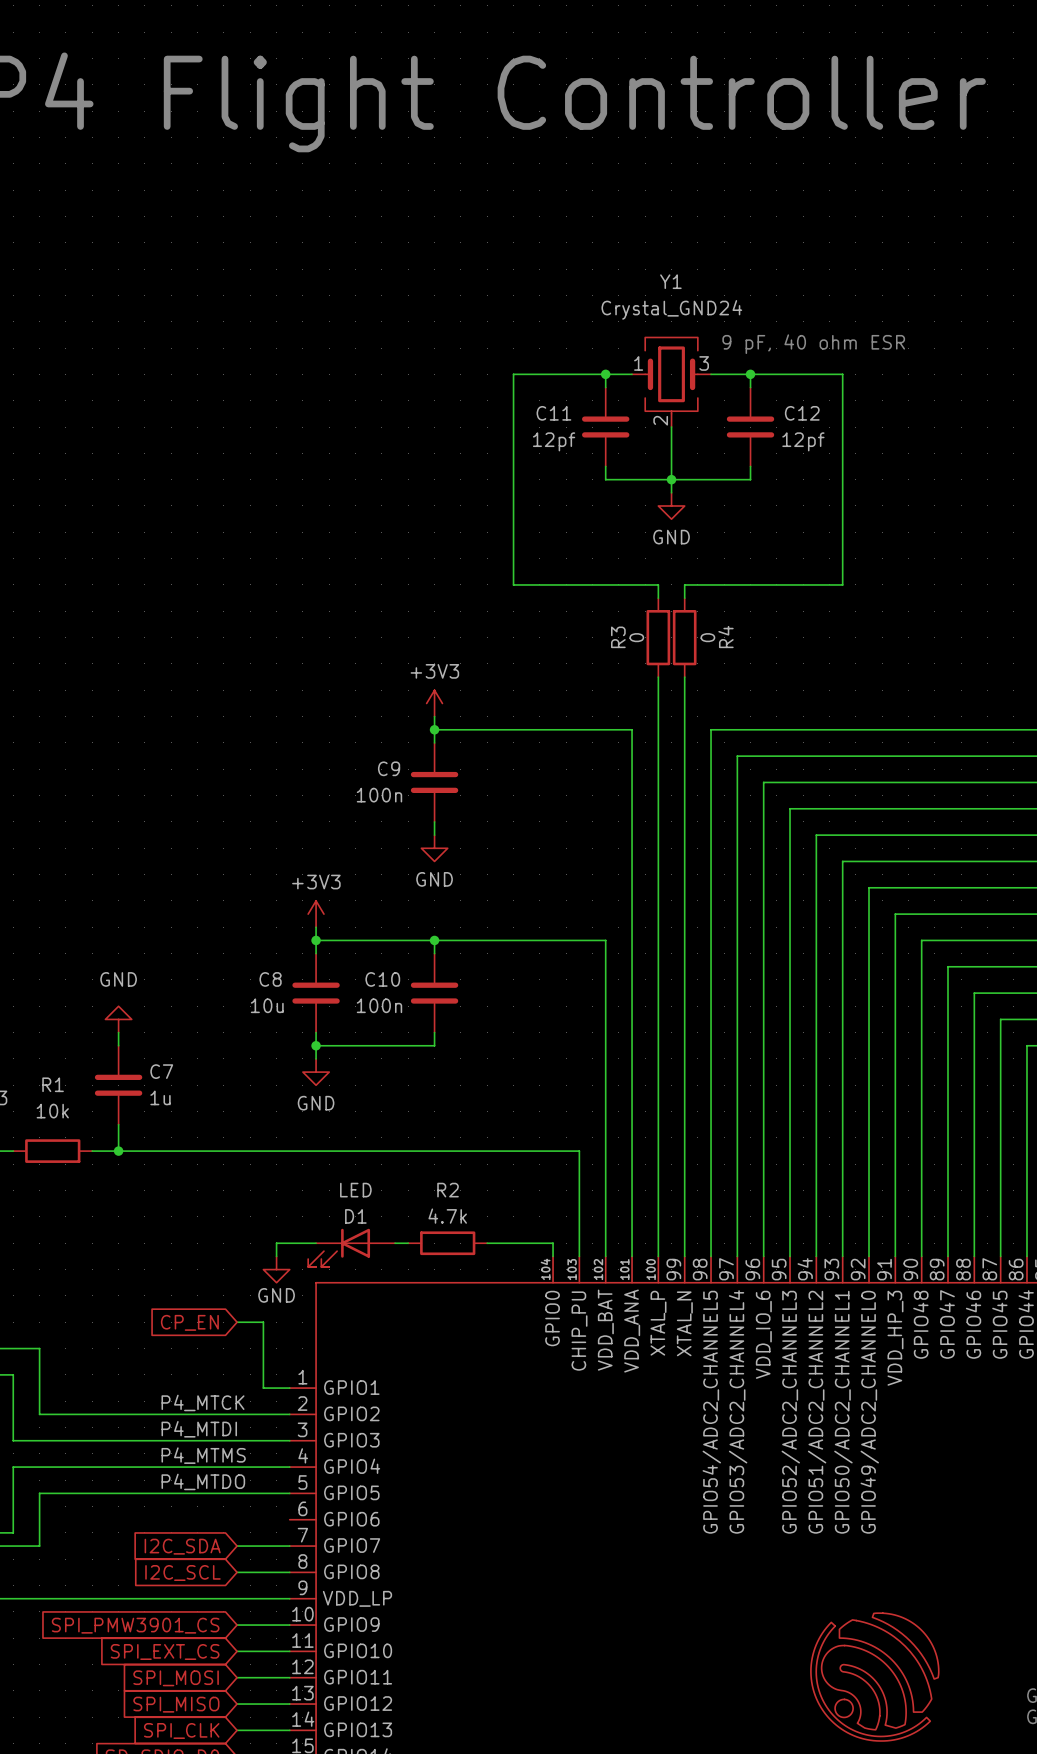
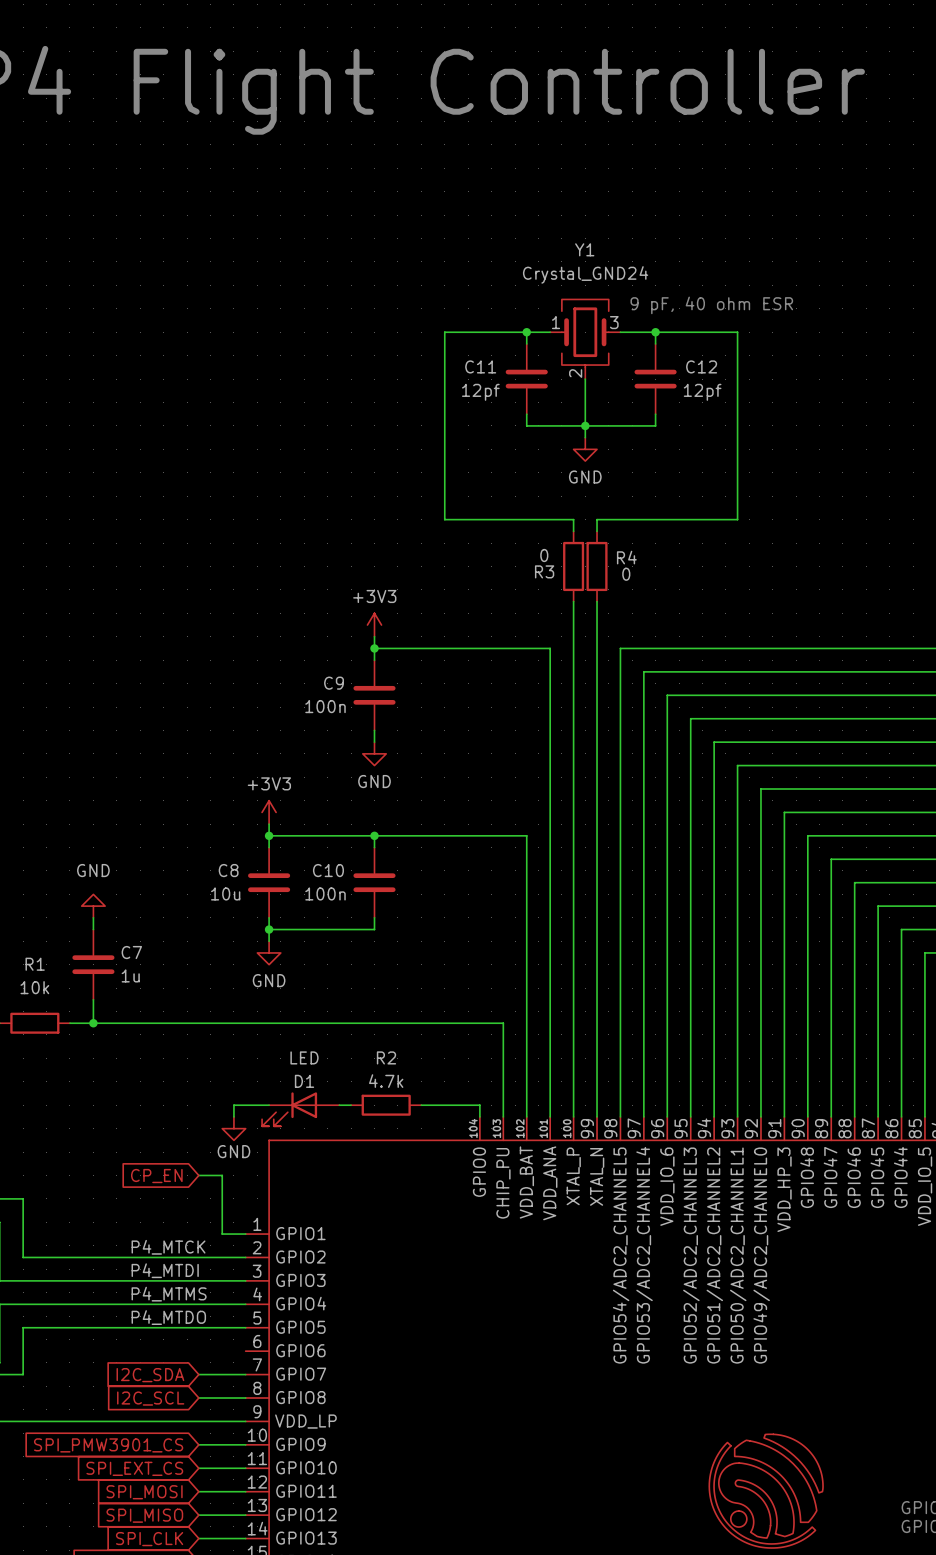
R3 name rotation: 0° (618, 637) -> 90° clockwise (544, 571)
R3 value rotation: 0° (636, 637) -> 90° clockwise (544, 555)
R4 value rotation: 0° (707, 637) -> 90° clockwise (626, 574)
R4 name rotation: 0° (726, 637) -> 90° clockwise (626, 557)

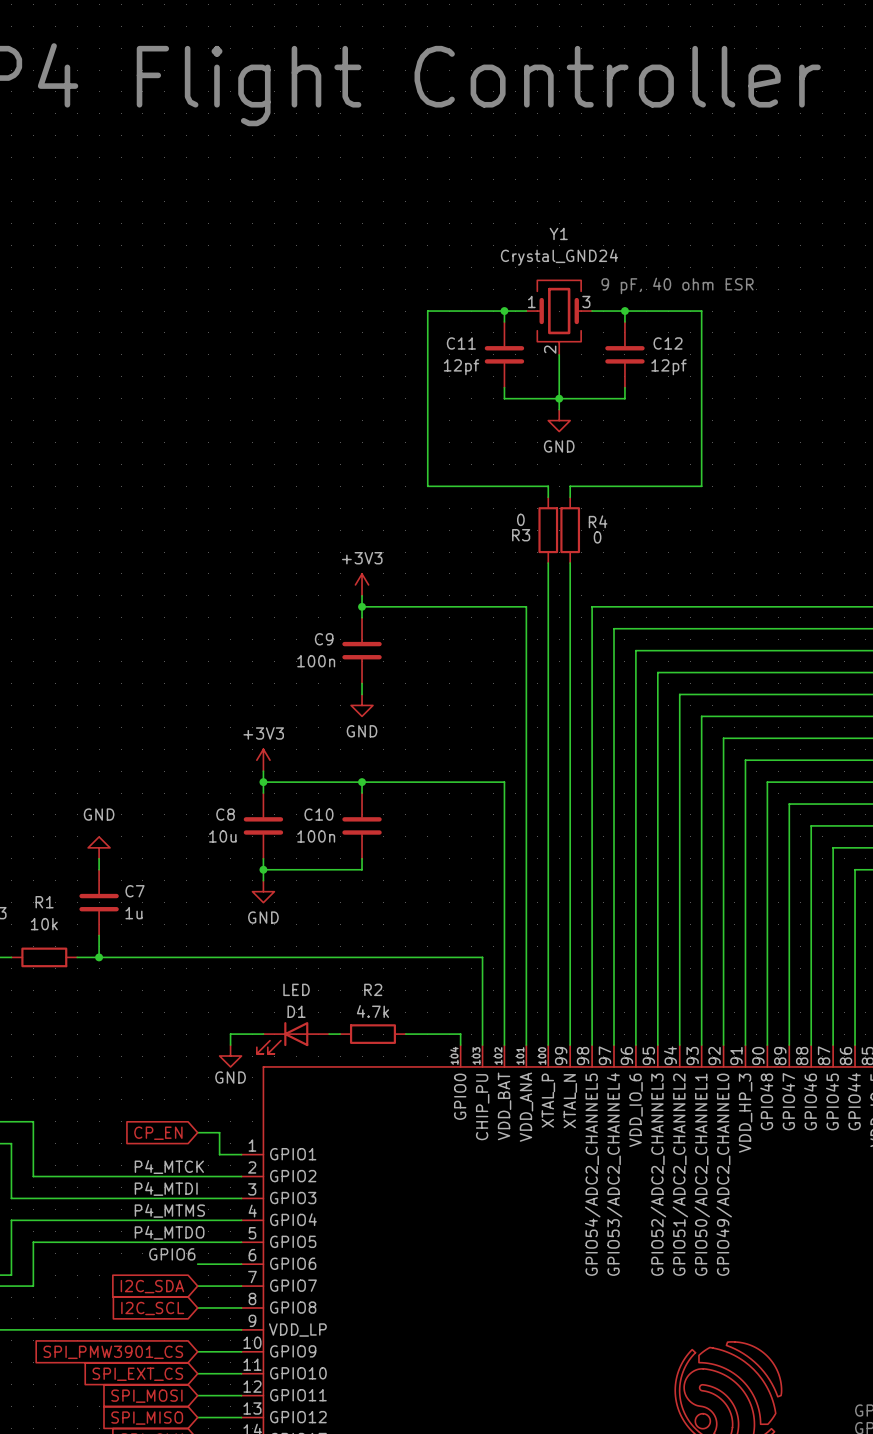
wire: (198, 1175) (222, 1175) (222, 1210) -> (197, 1132) (219, 1132)
global label position: CP_EN (156, 1176) -> CP_EN (158, 1133)
label: none -> GPIO6 (172, 1254)
wire: none -> (197, 1264) (241, 1264)

